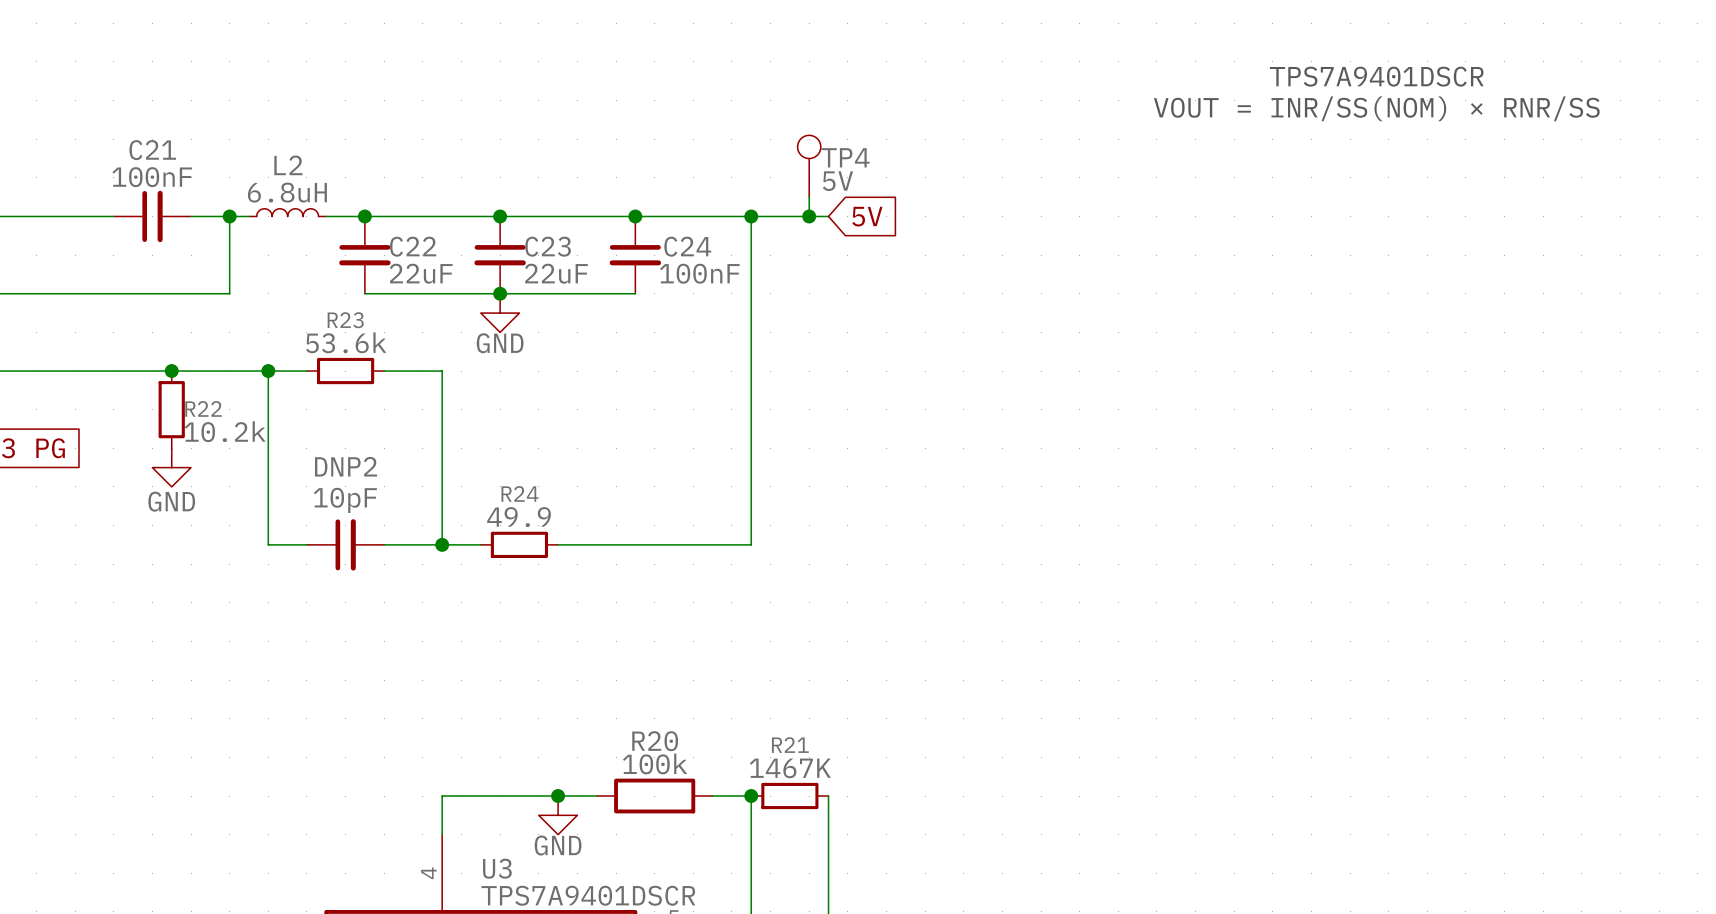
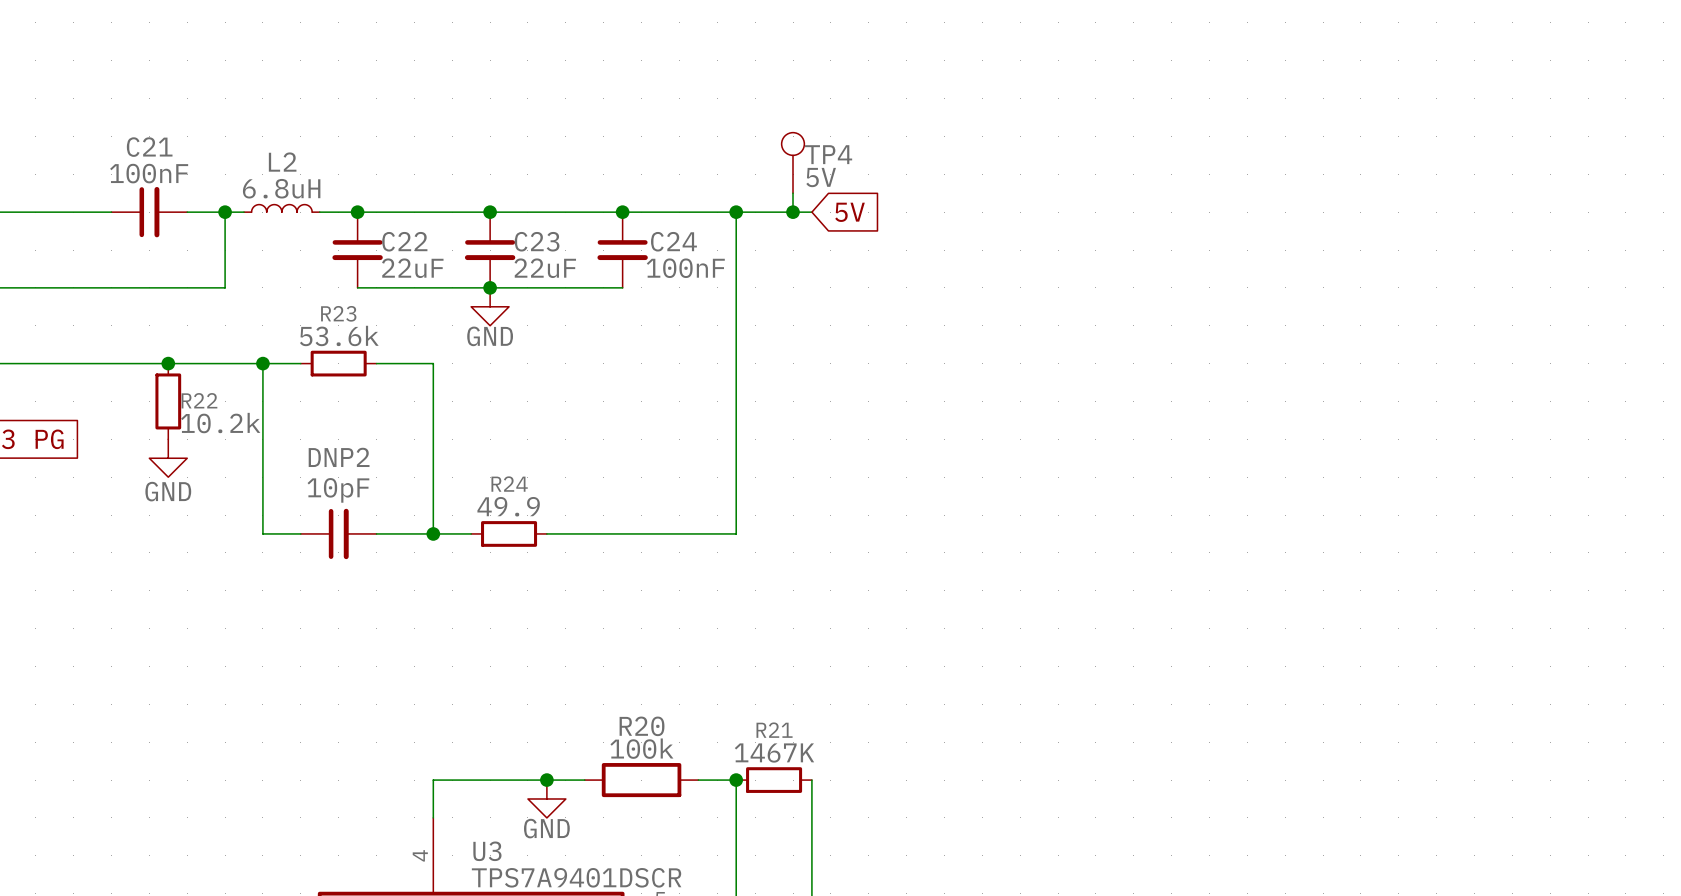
text: TPS7A9401DSCR (1376, 76) -> none
text: VOUT = INR/SS(NOM) × RNR/SS (1376, 108) -> none

